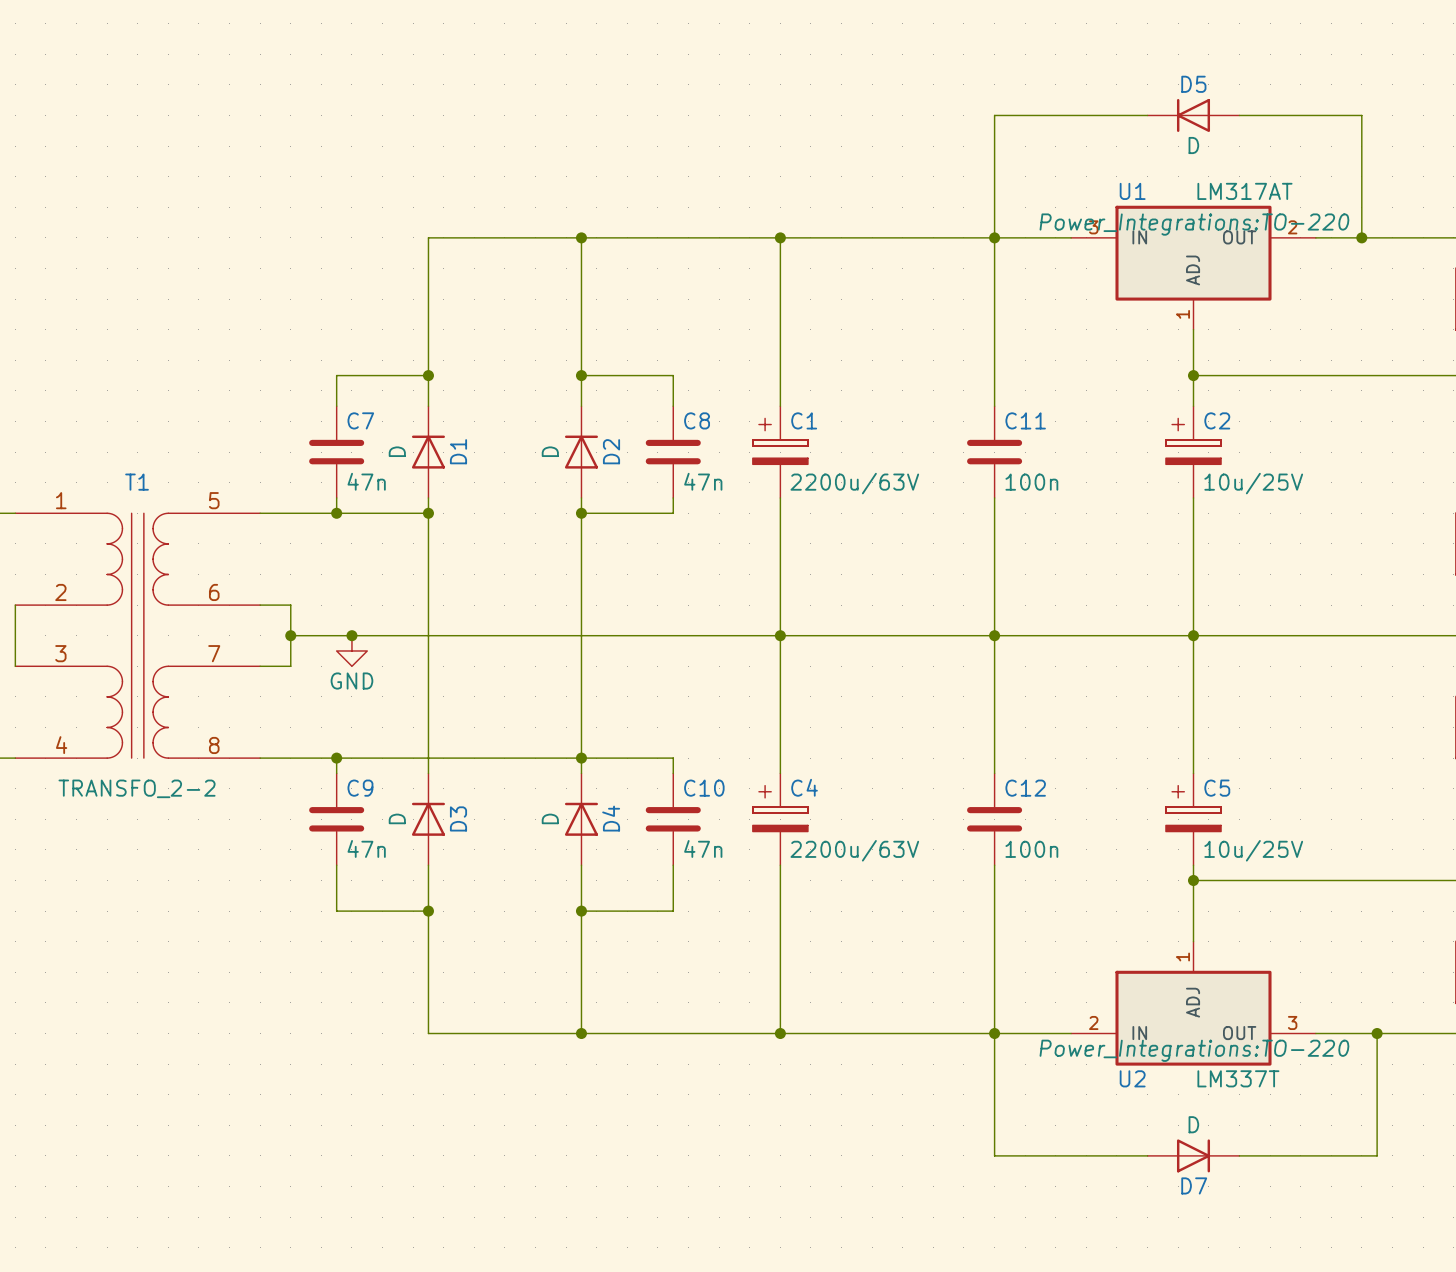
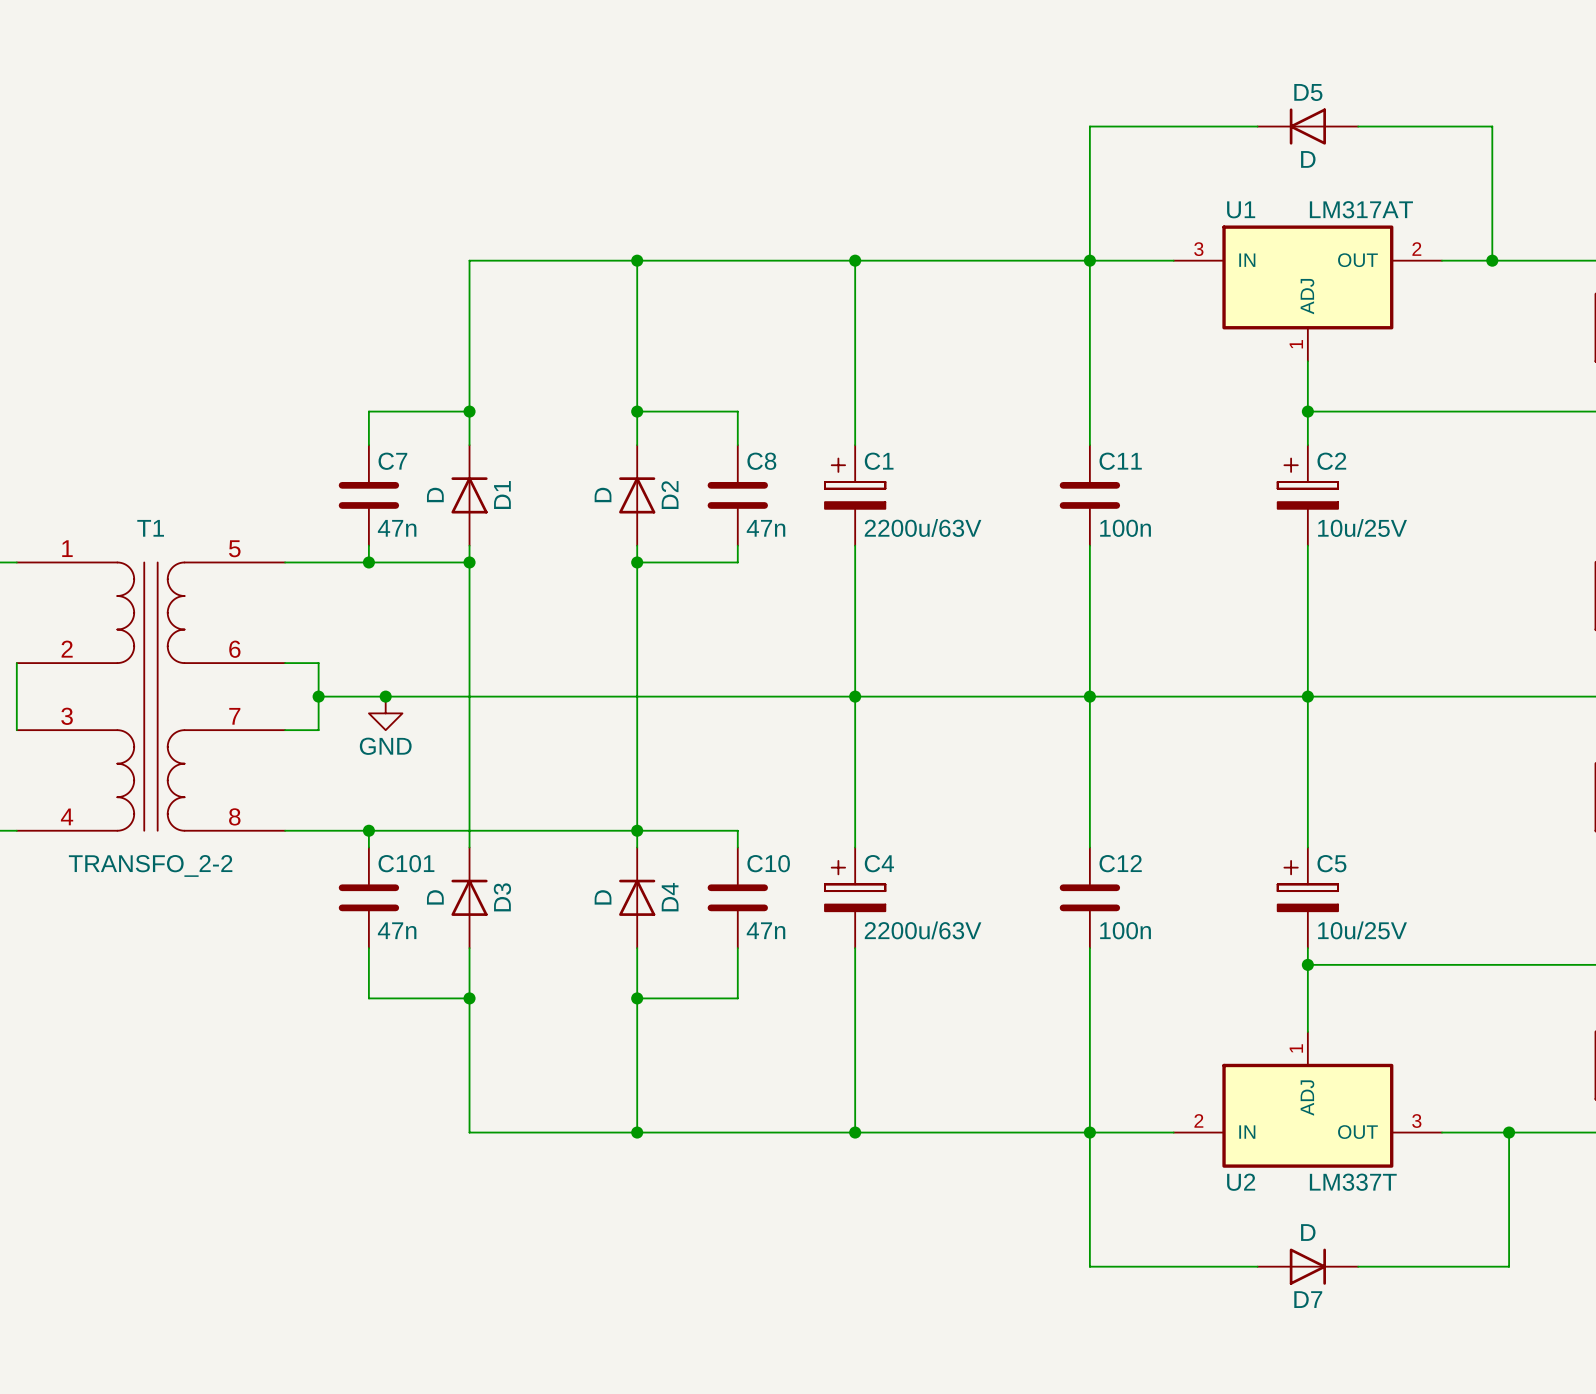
U1 text: Power_Integrations:TO-220 (1194, 224) -> none
C9 name: C9 (360, 788) -> C101 (406, 863)
U2 text: Power_Integrations:TO-220 (1194, 1050) -> none

